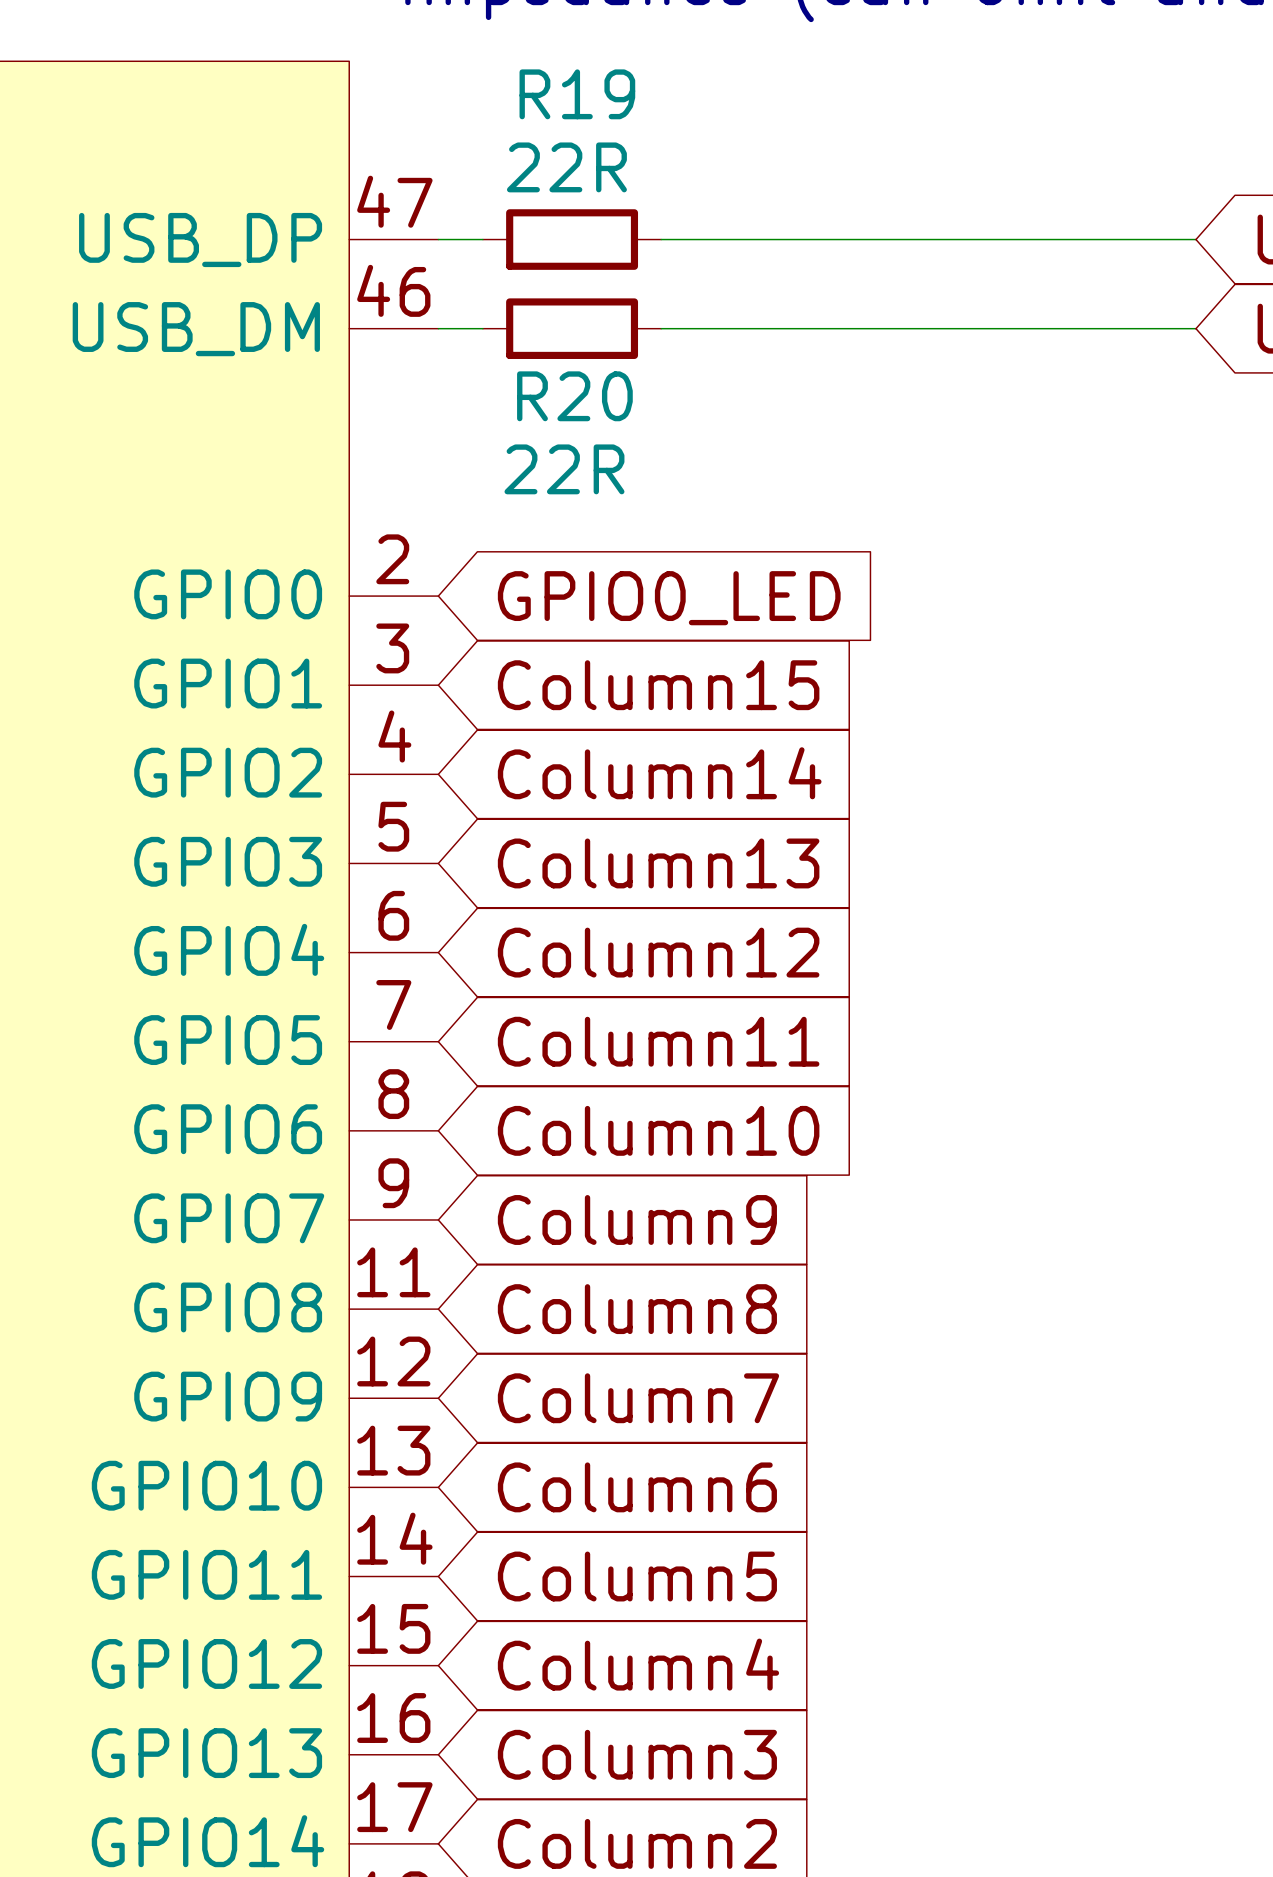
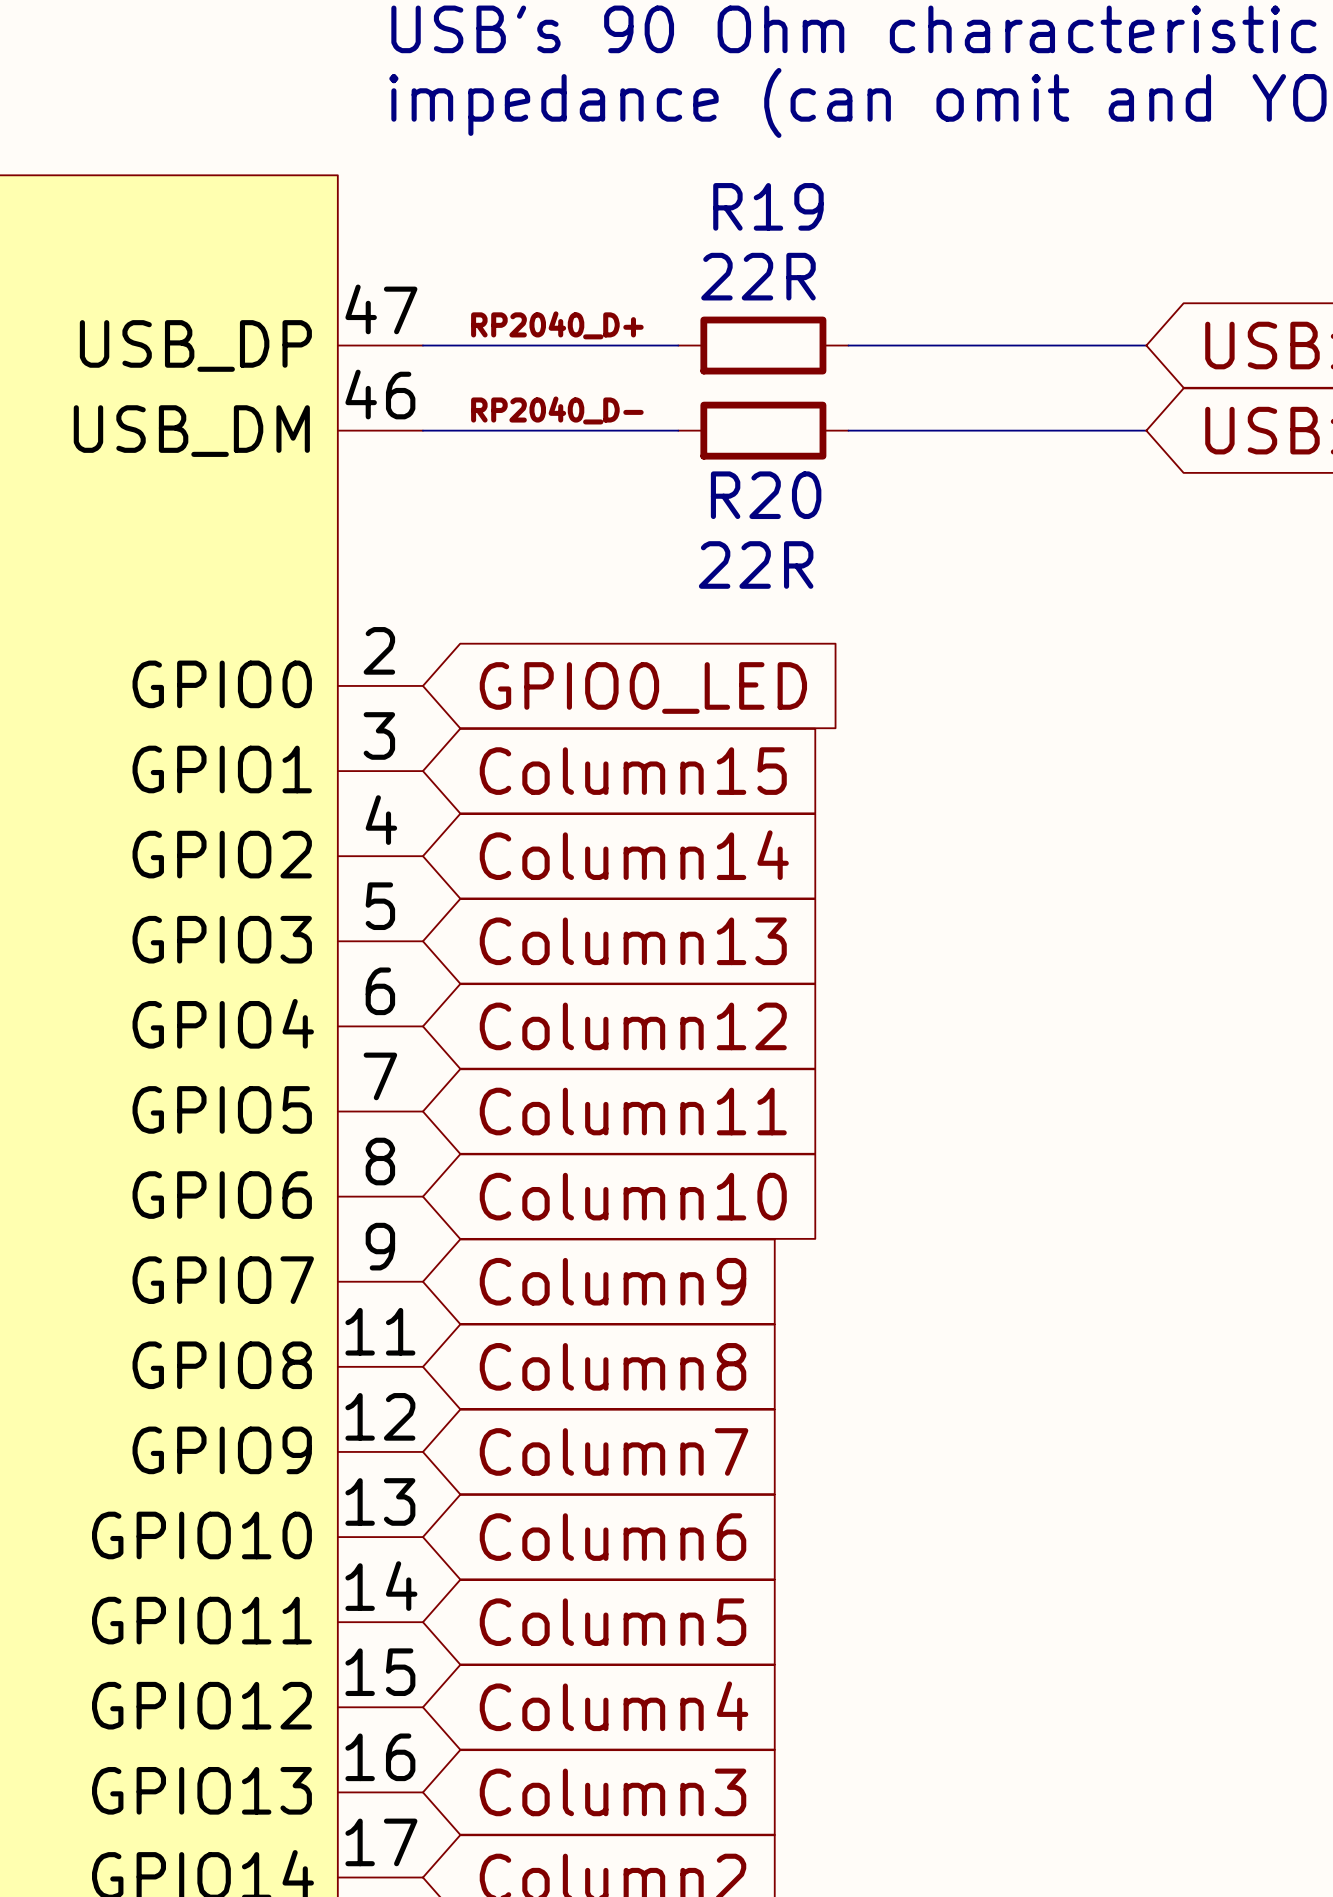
label: none -> RP2040_D+ (557, 325)
R19 position: (572, 239) -> (763, 345)
wire: (705, 239) (884, 239) -> (465, 345) (635, 345)
label: none -> RP2040_D- (557, 410)
R20 position: (572, 328) -> (763, 430)
wire: (705, 328) (884, 328) -> (465, 430) (635, 430)

